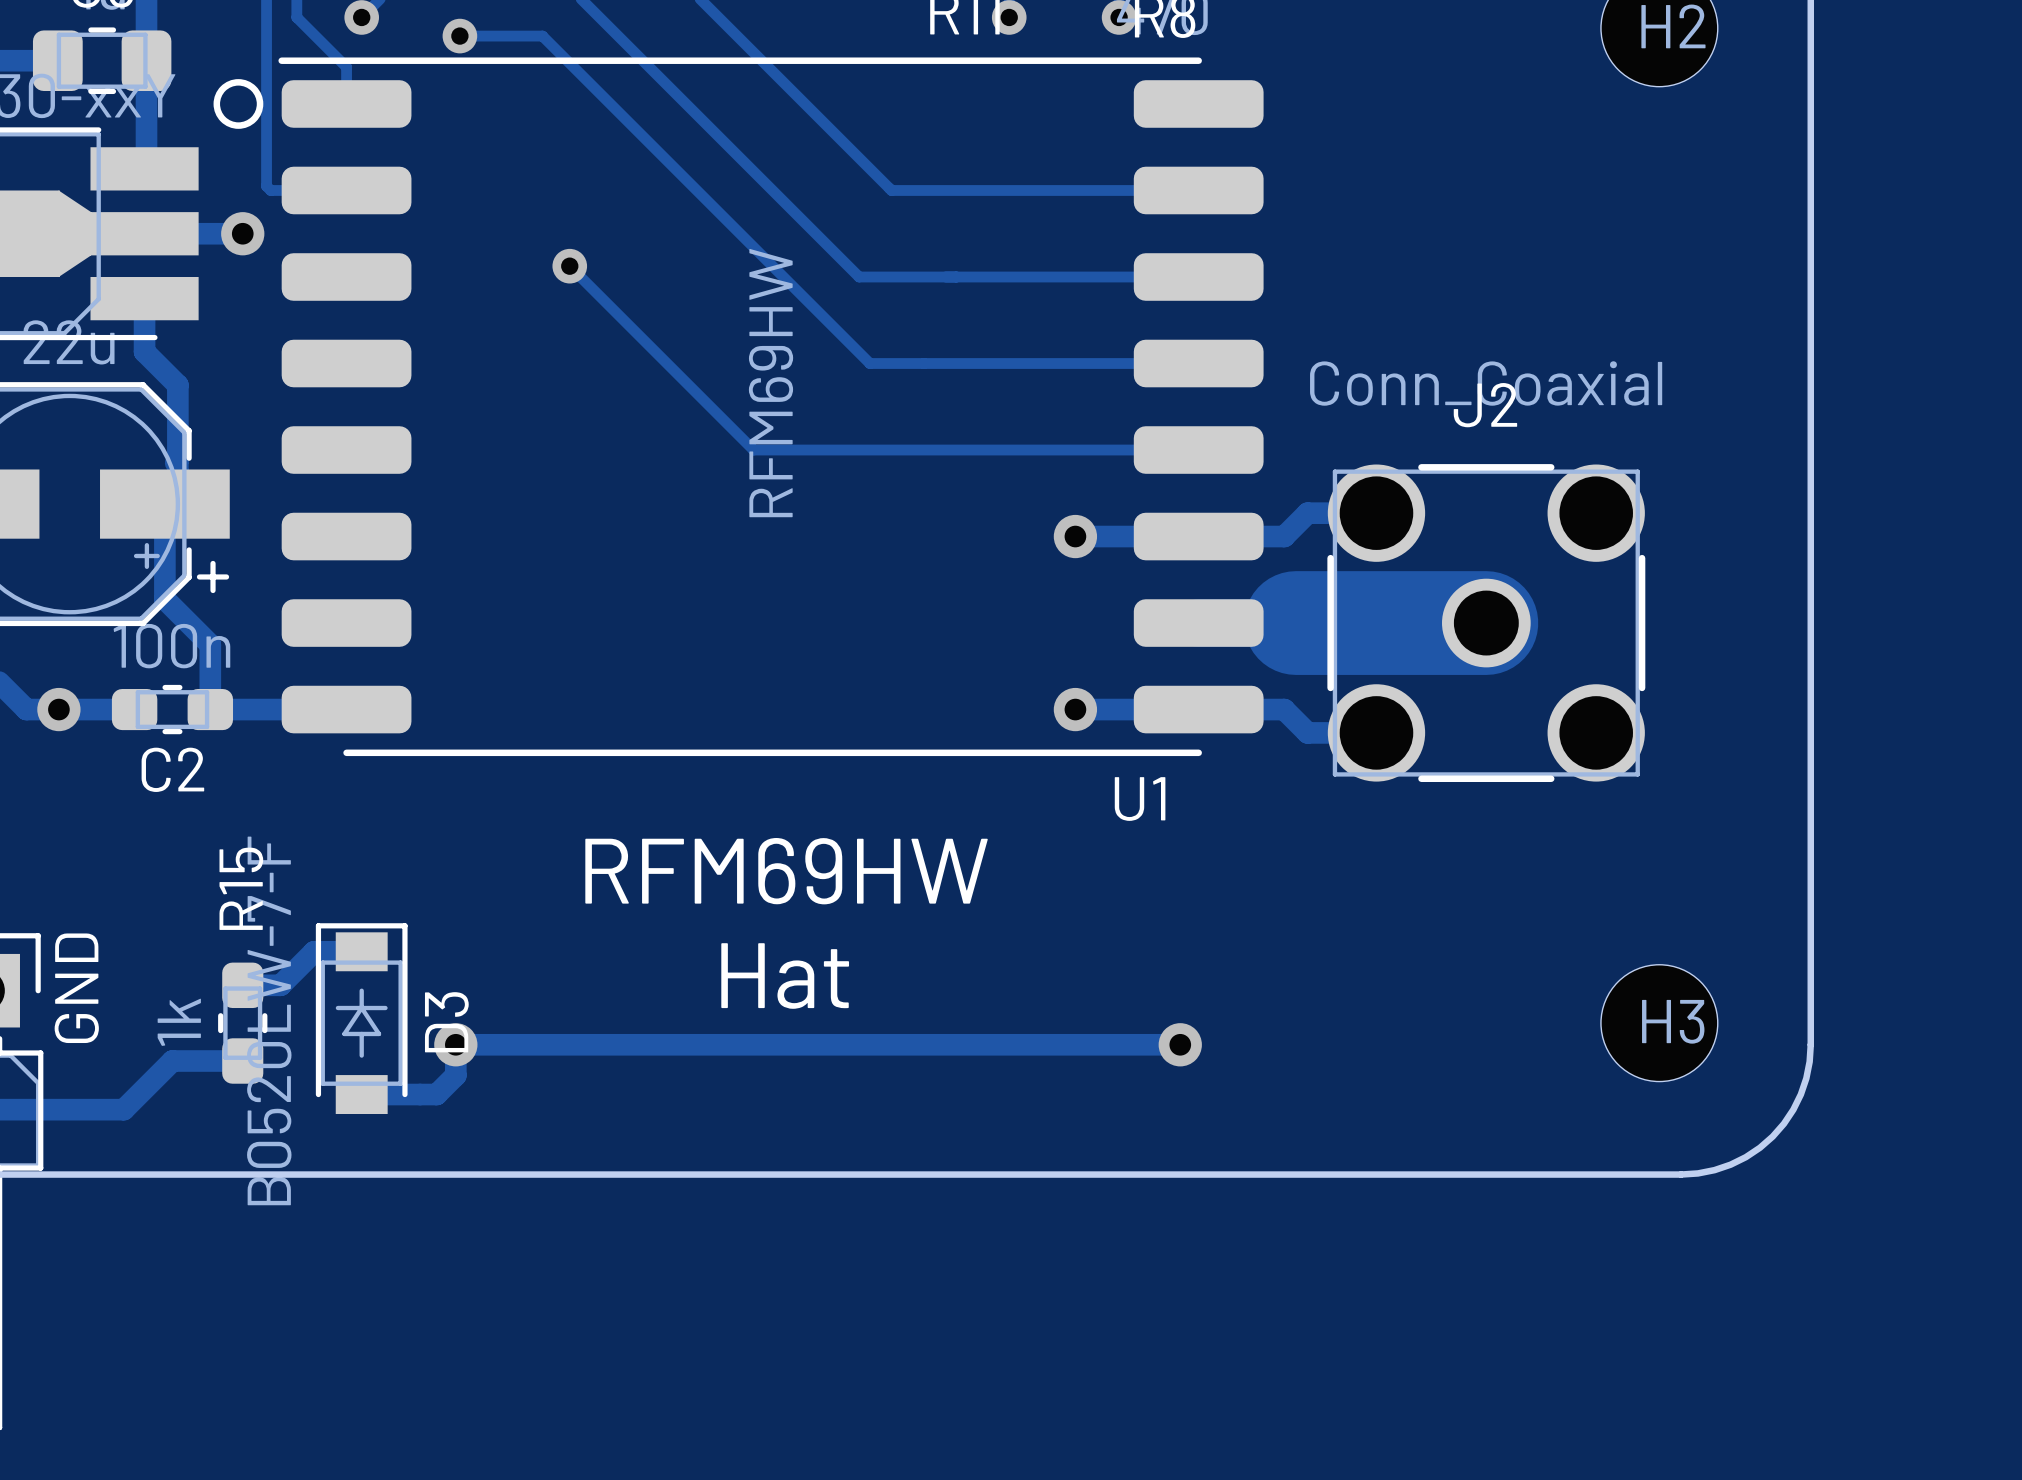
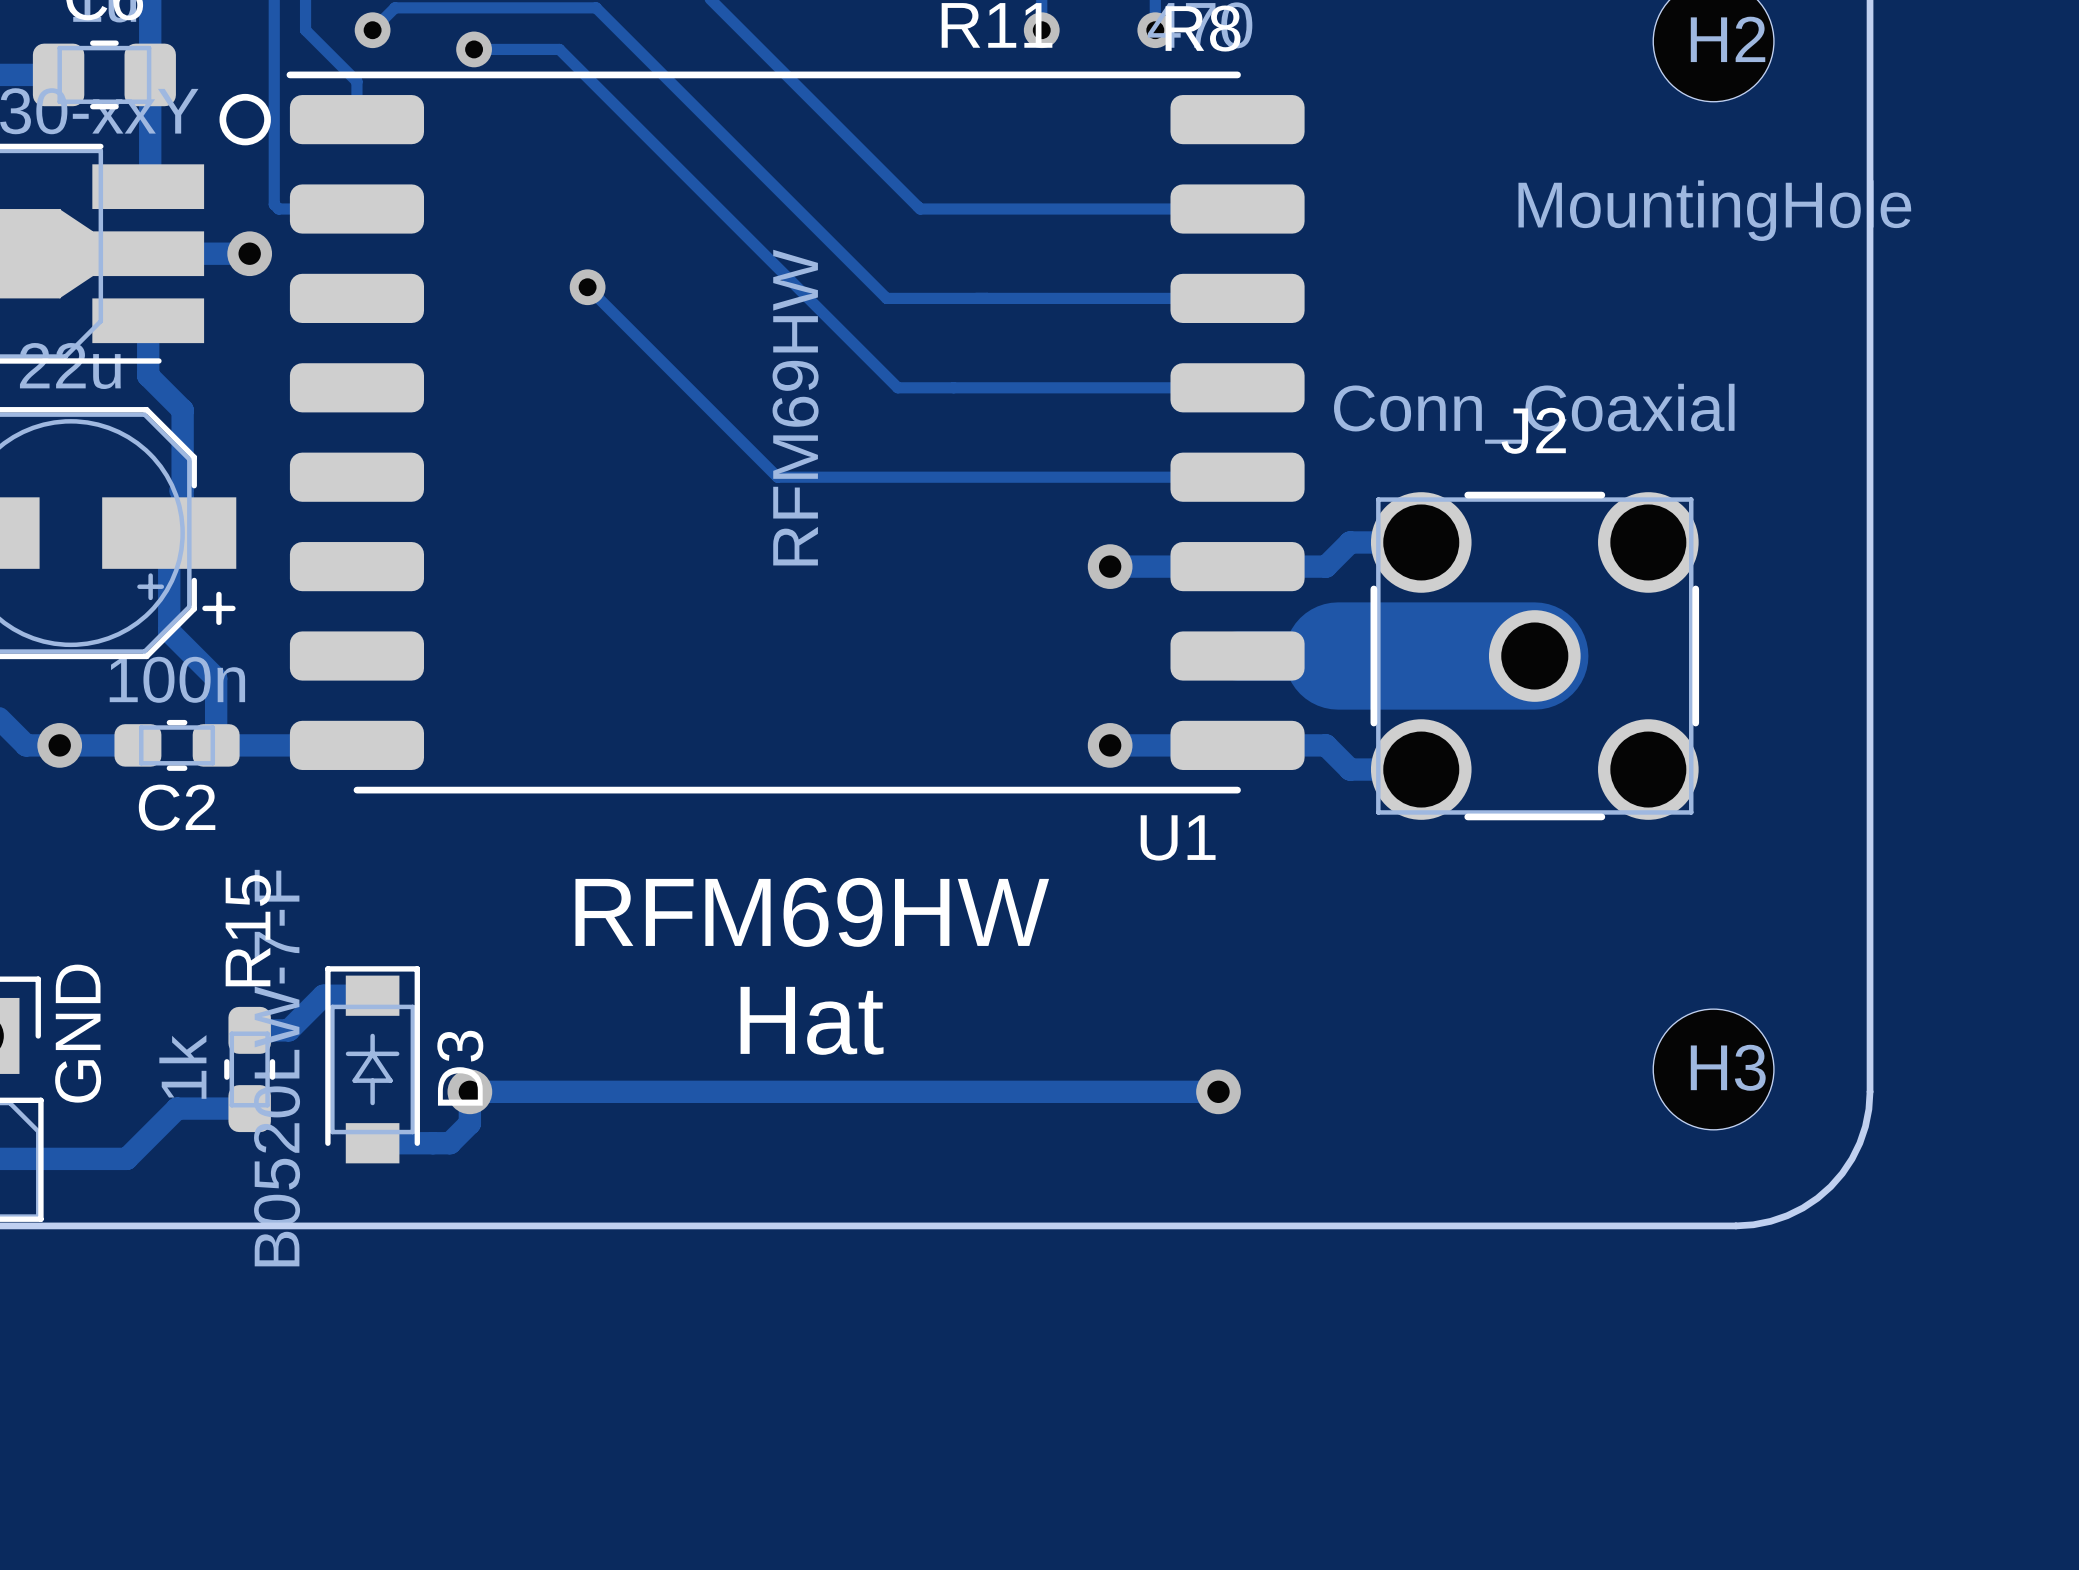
H2 value: none -> MountingHole (1714, 210)

